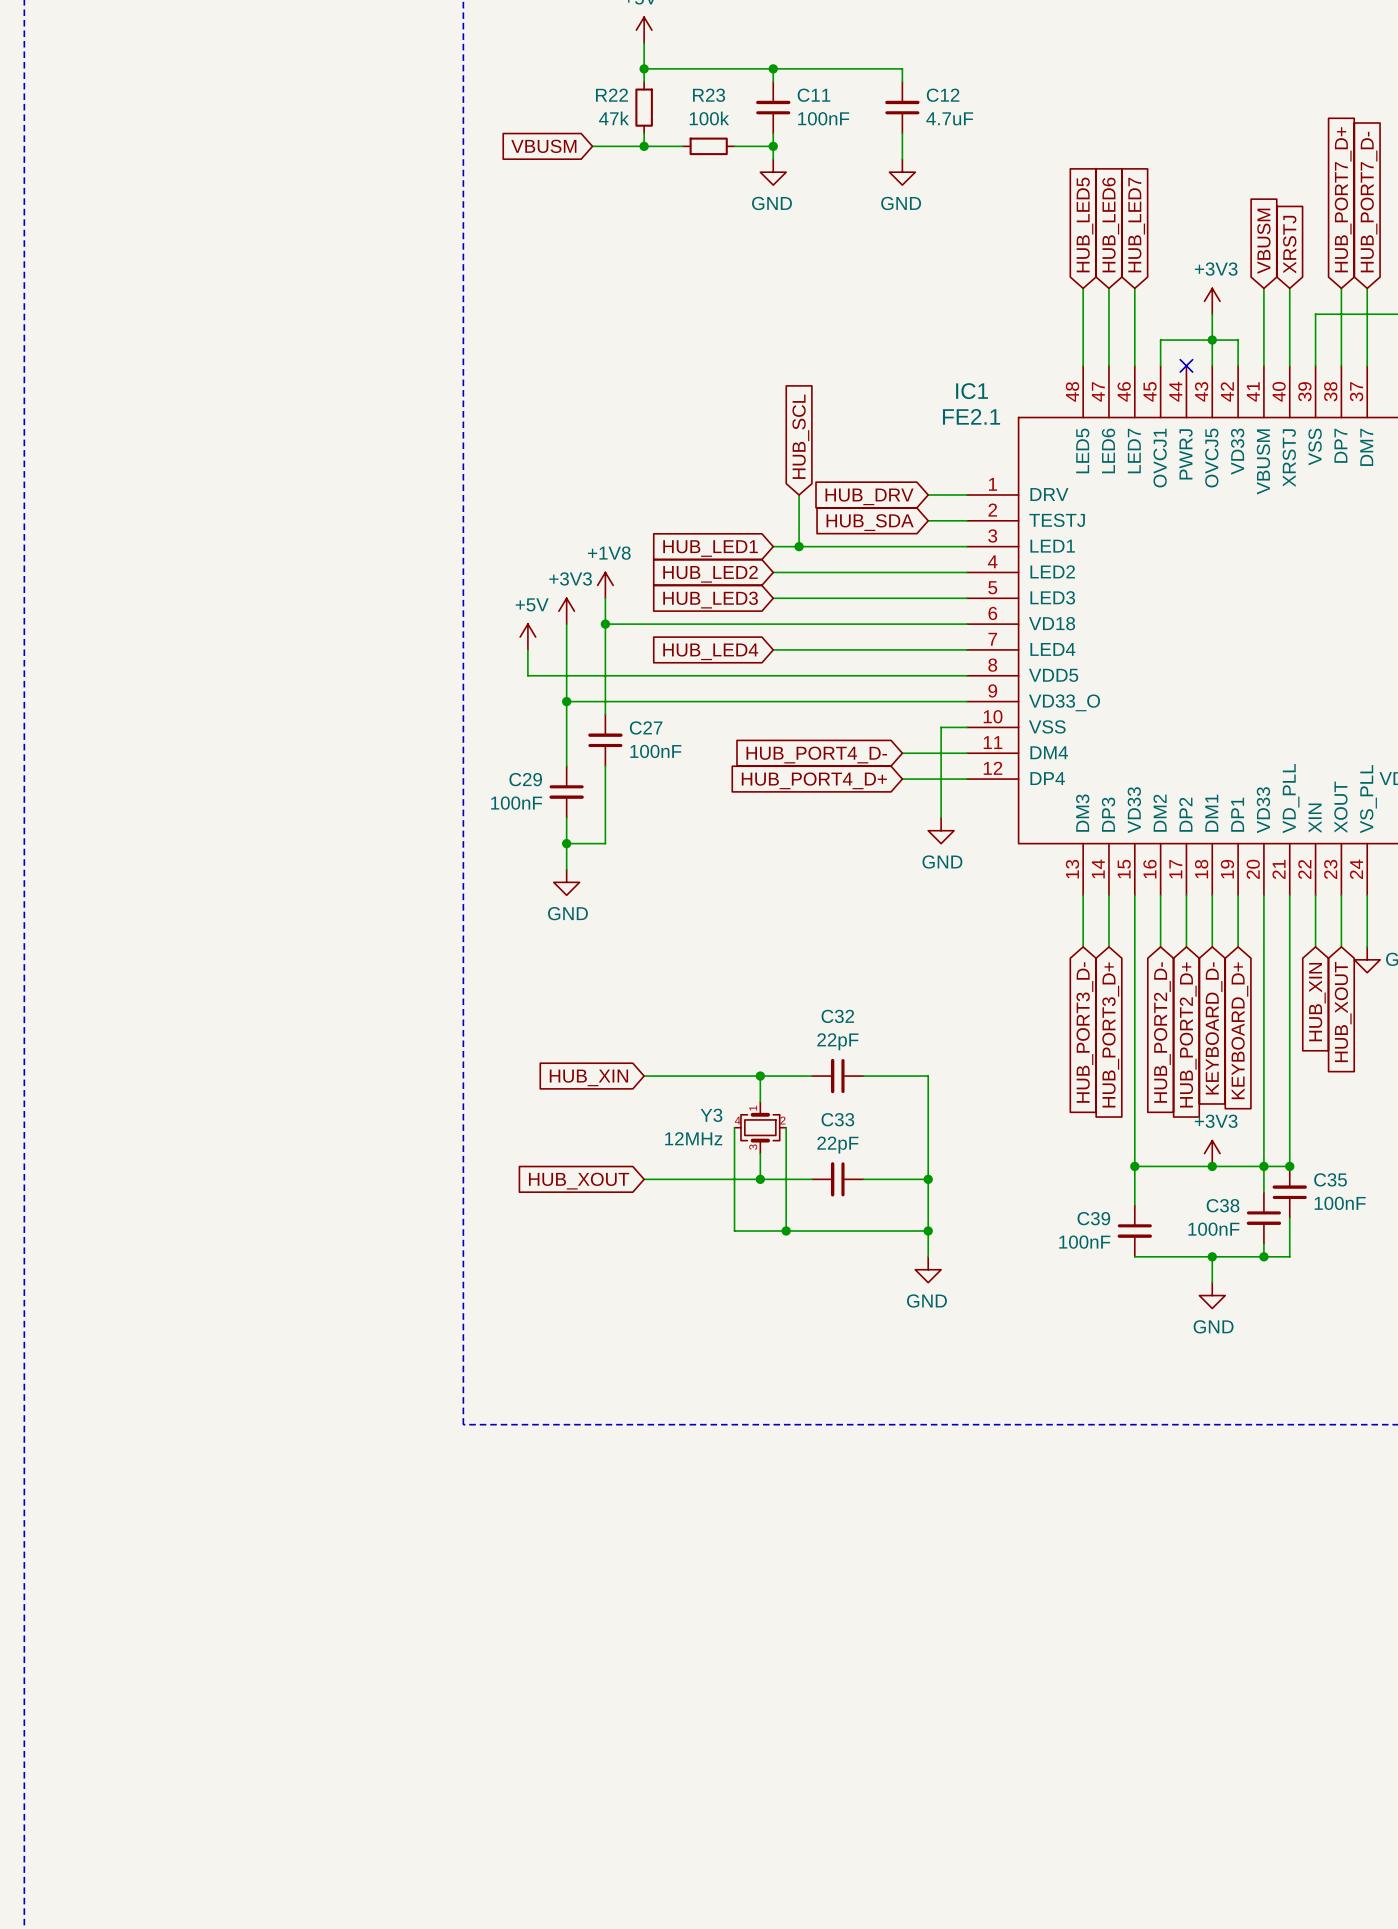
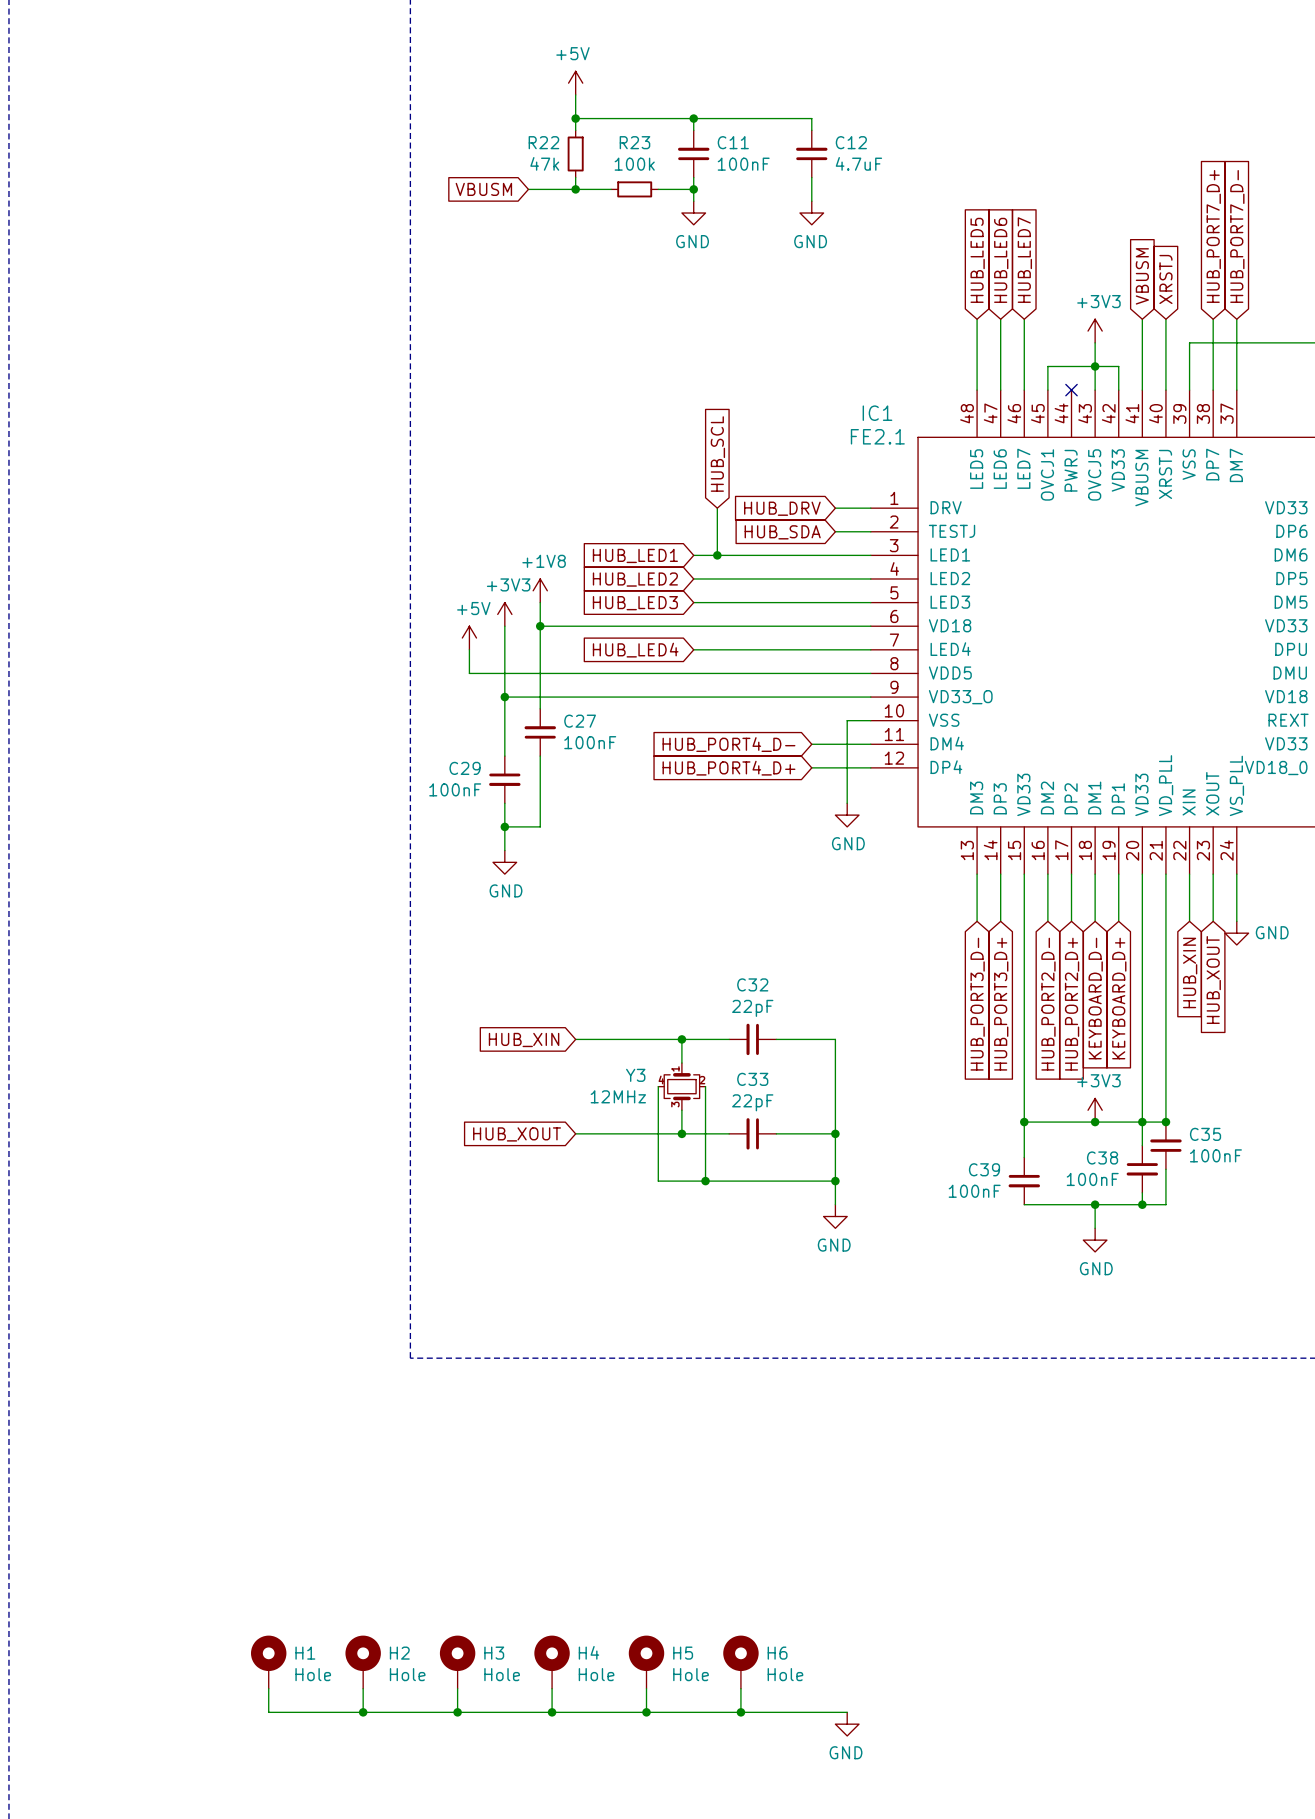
H1: none -> Hole (268, 1662)
H2: none -> Hole (363, 1662)
H3: none -> Hole (457, 1662)
H4: none -> Hole (552, 1662)
H5: none -> Hole (646, 1662)
H6: none -> Hole (740, 1662)
wire: none -> (268, 1688) (268, 1712) (847, 1712)
wire: none -> (363, 1688) (363, 1712)
wire: none -> (457, 1688) (457, 1712)
wire: none -> (552, 1688) (552, 1712)
wire: none -> (646, 1688) (646, 1712)
wire: none -> (740, 1688) (740, 1712)
junction: none -> (363, 1712)
junction: none -> (457, 1712)
junction: none -> (552, 1712)
junction: none -> (646, 1712)
junction: none -> (740, 1712)
power symbol: none -> GND (847, 1724)

